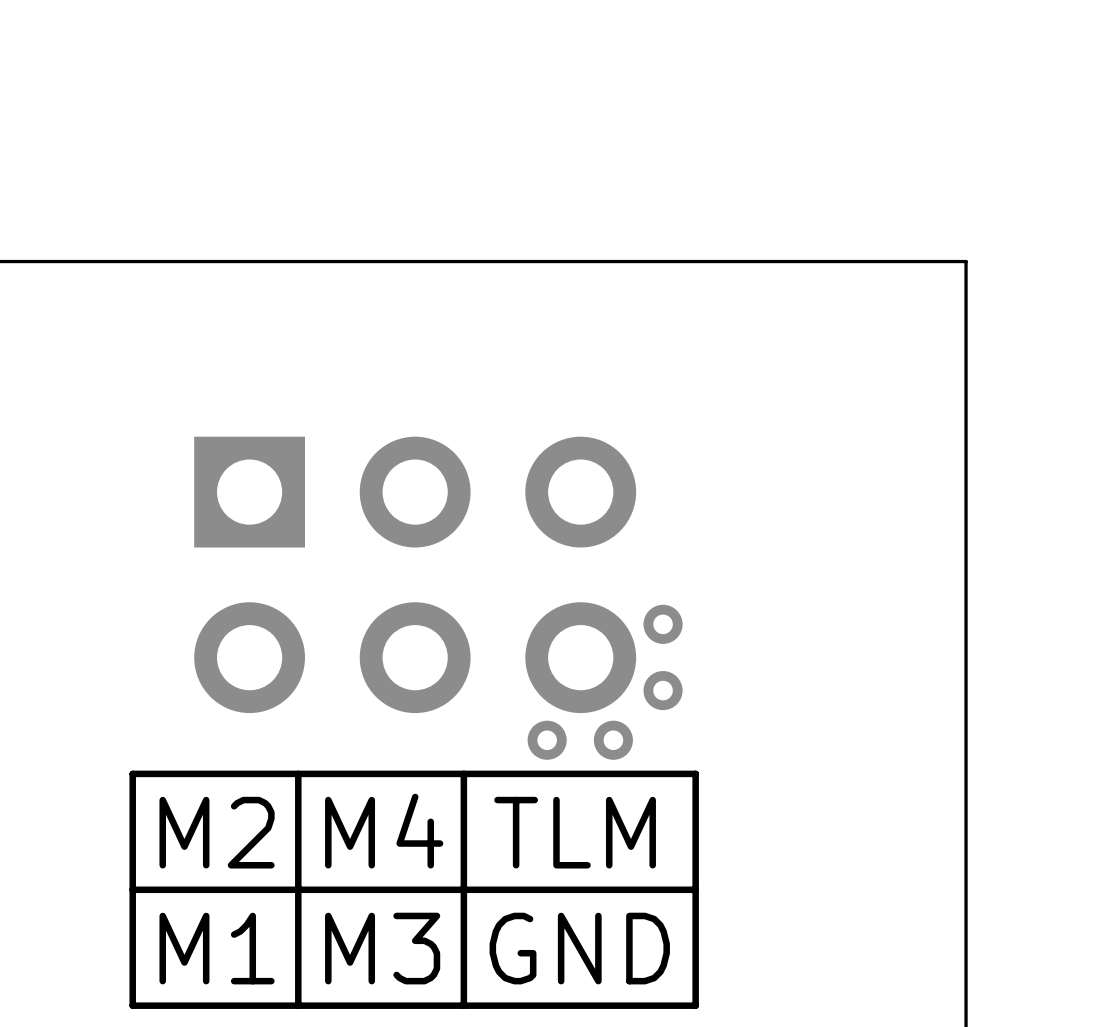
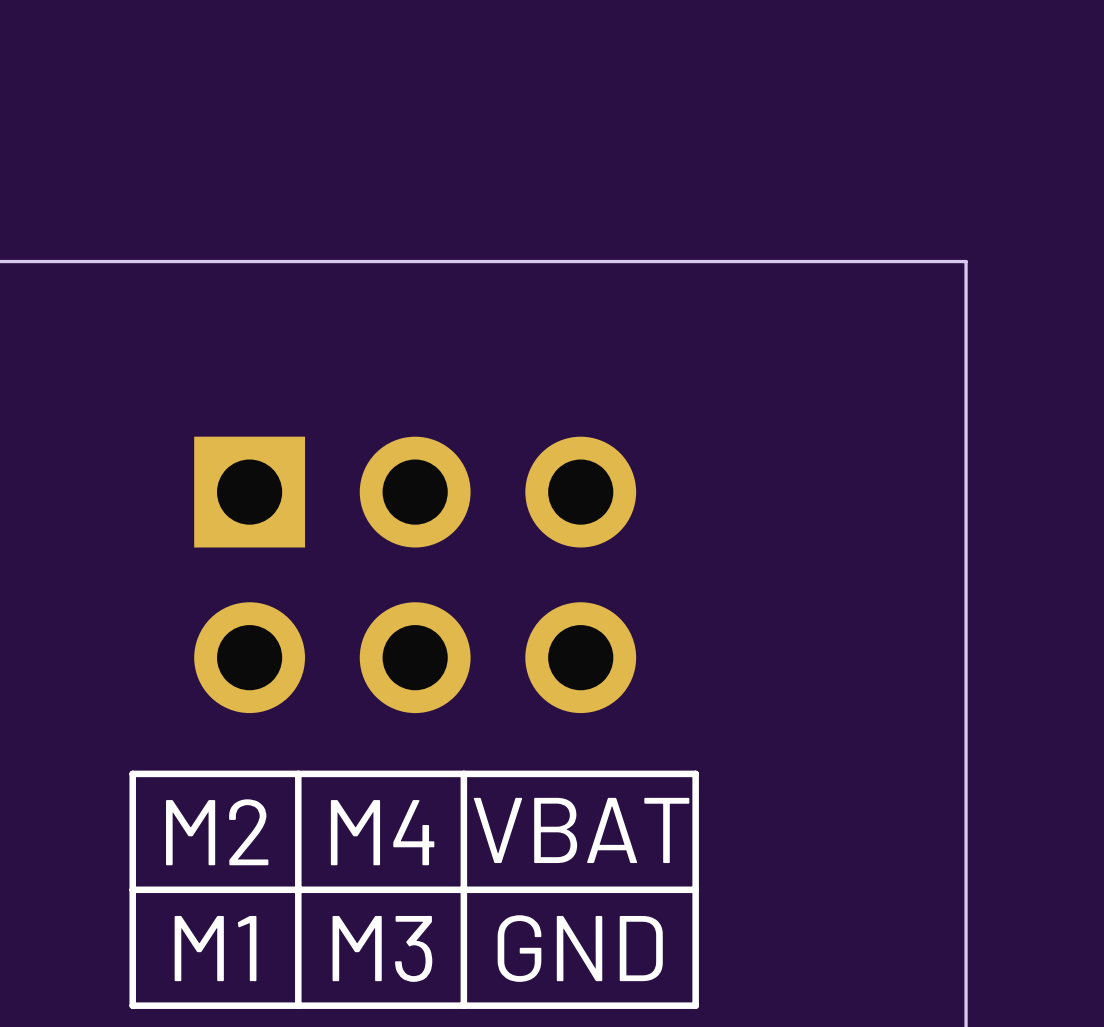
via: (663, 624) -> none
via: (663, 690) -> none
via: (547, 740) -> none
via: (613, 740) -> none
text: TLM (575, 832) -> VBAT (581, 830)

